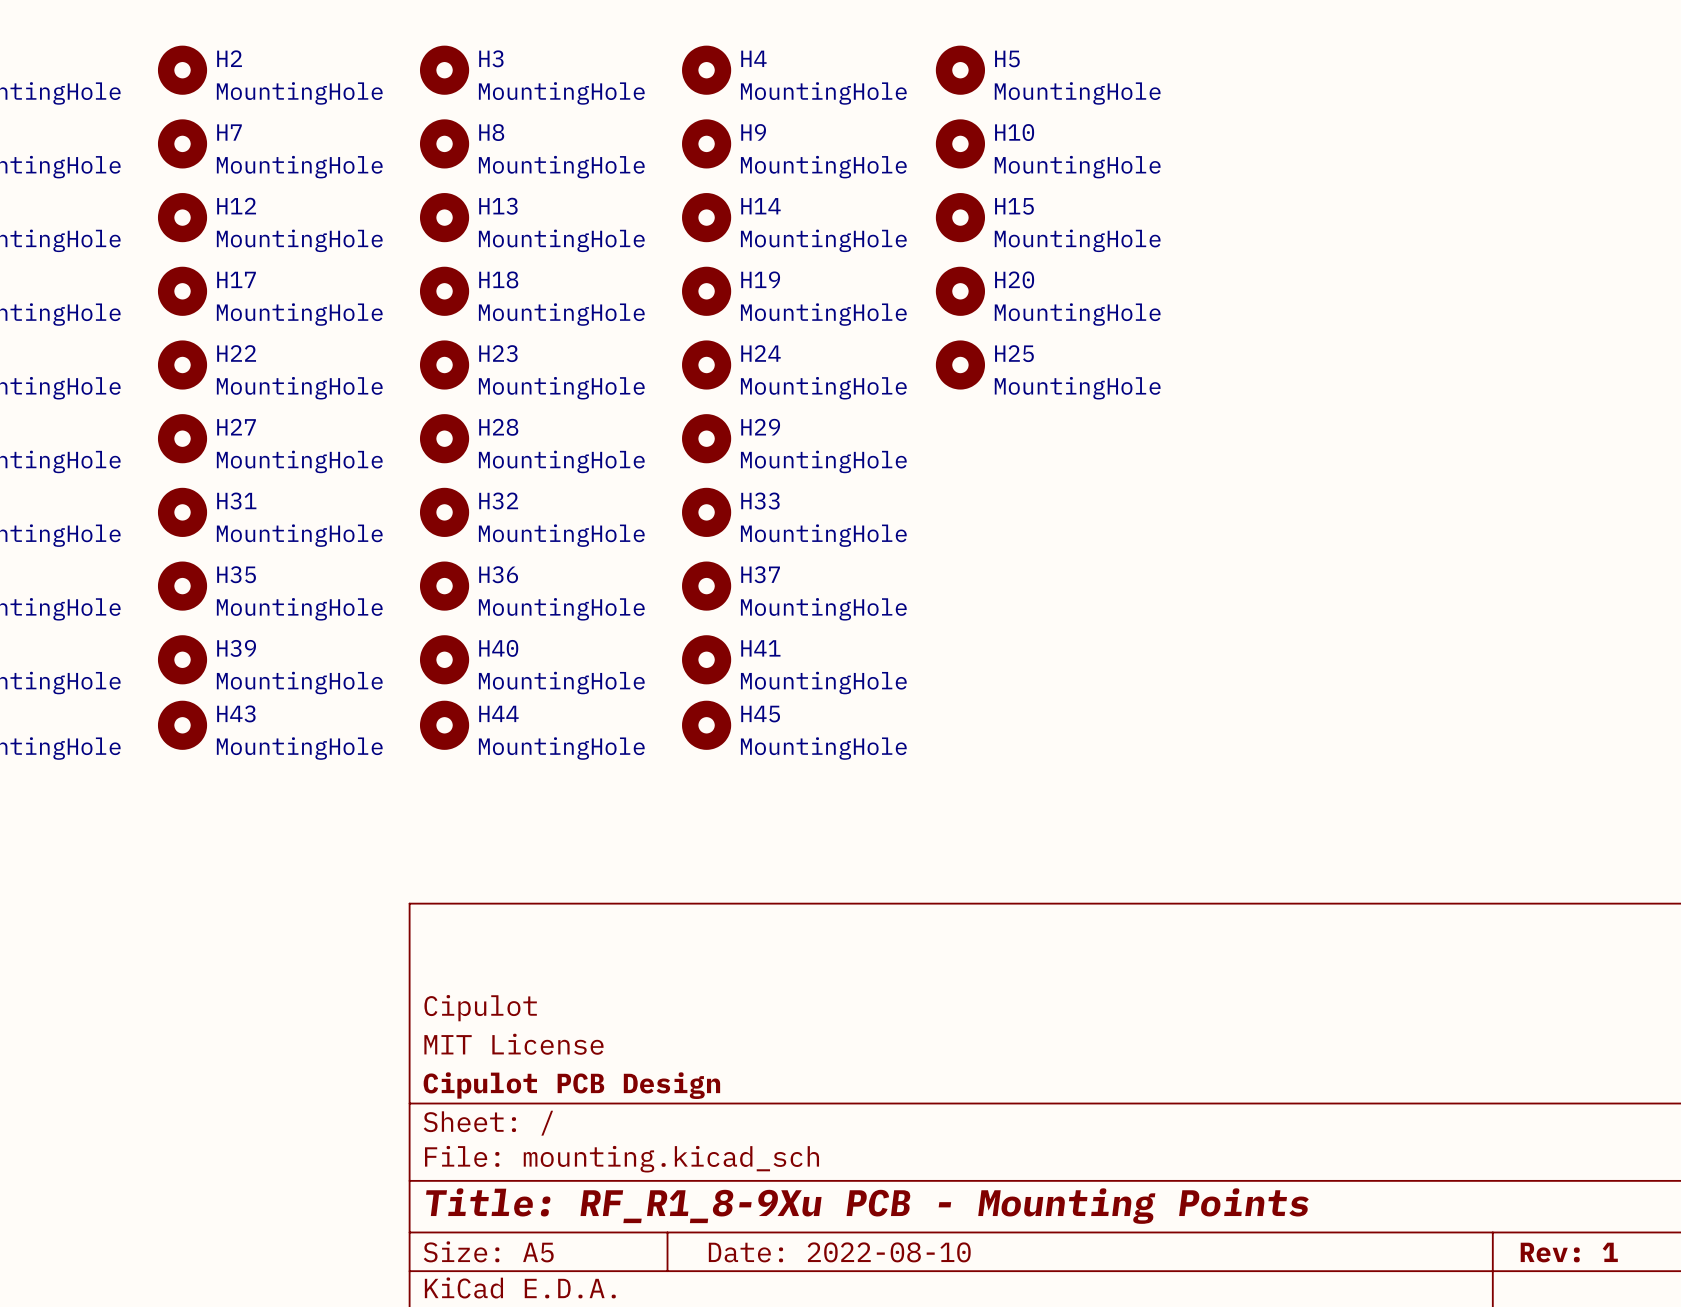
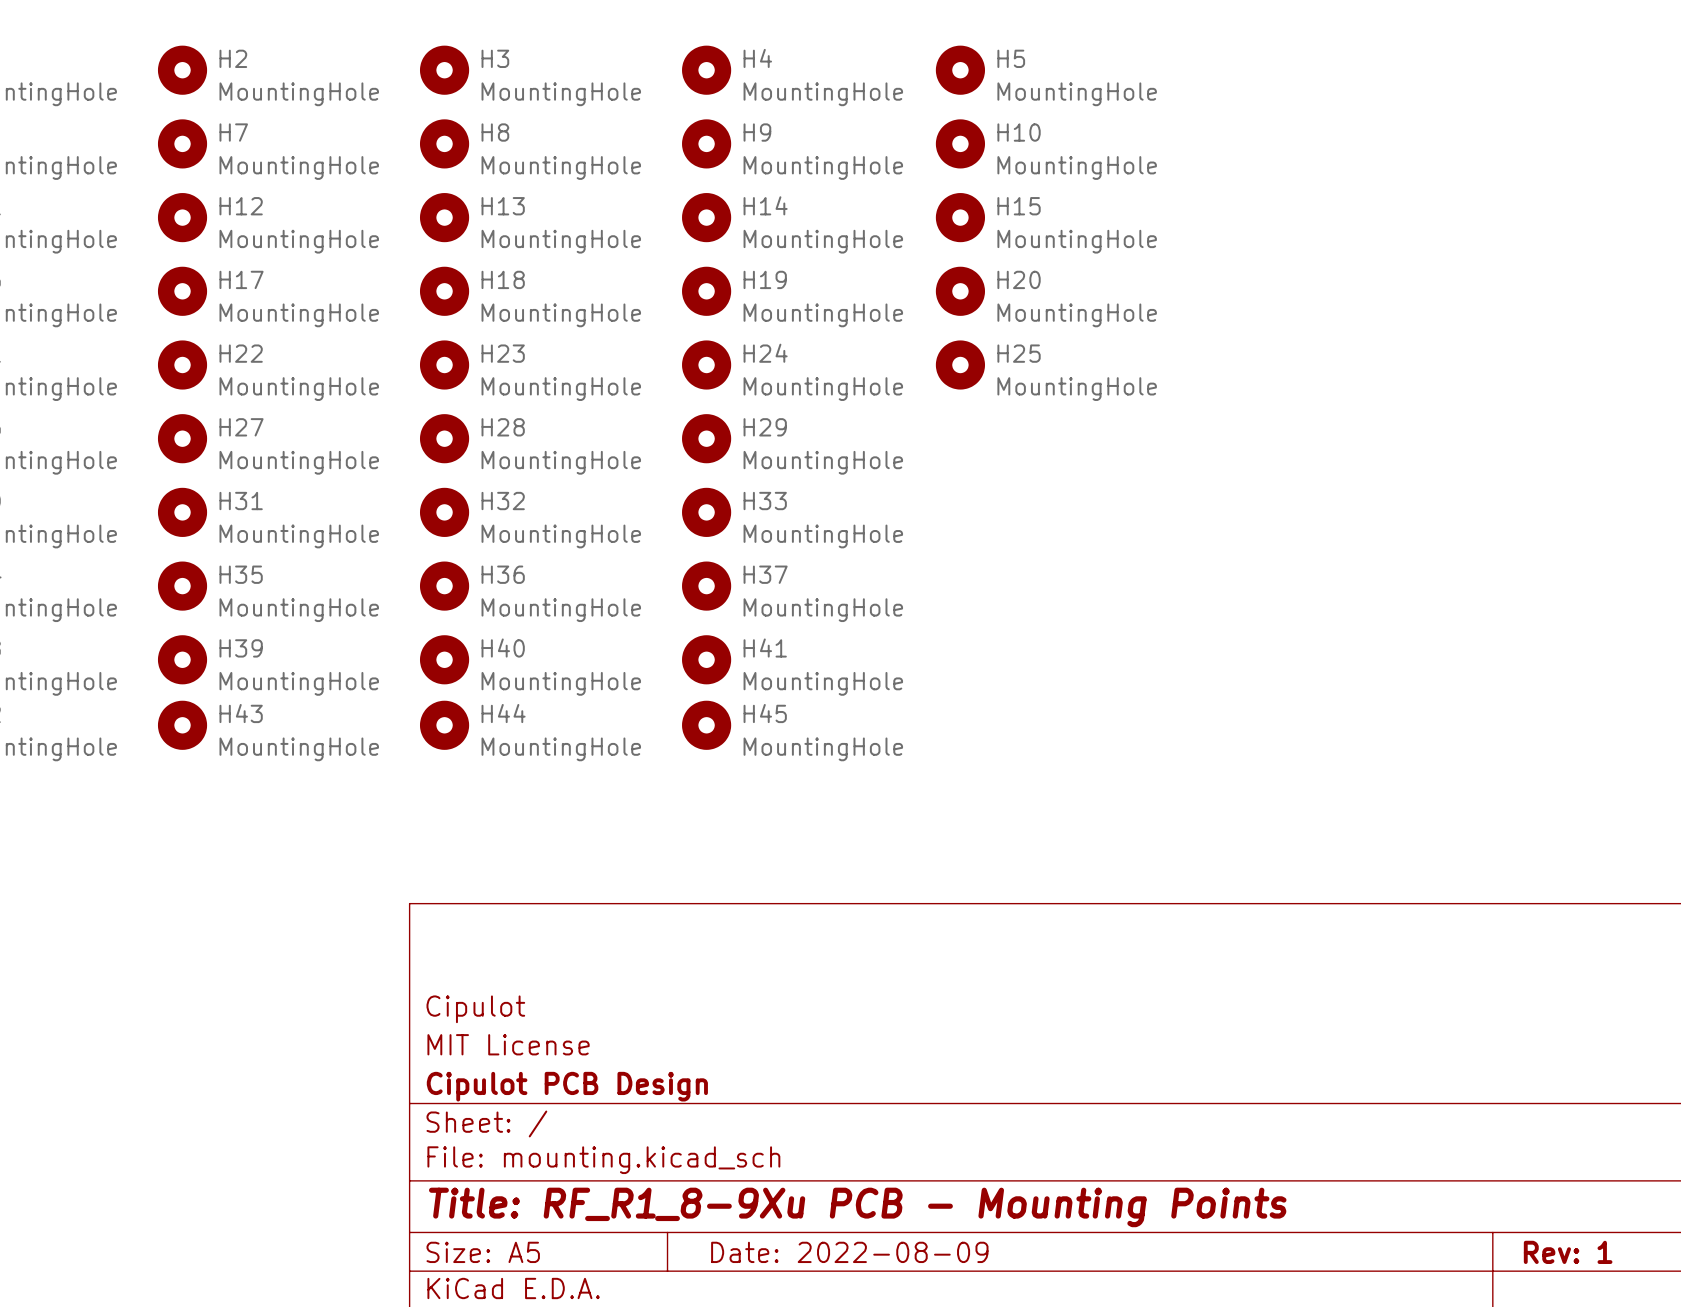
title block: Date: 2022-08-10 (839, 1252) -> Date: 2022-08-09 (849, 1252)

